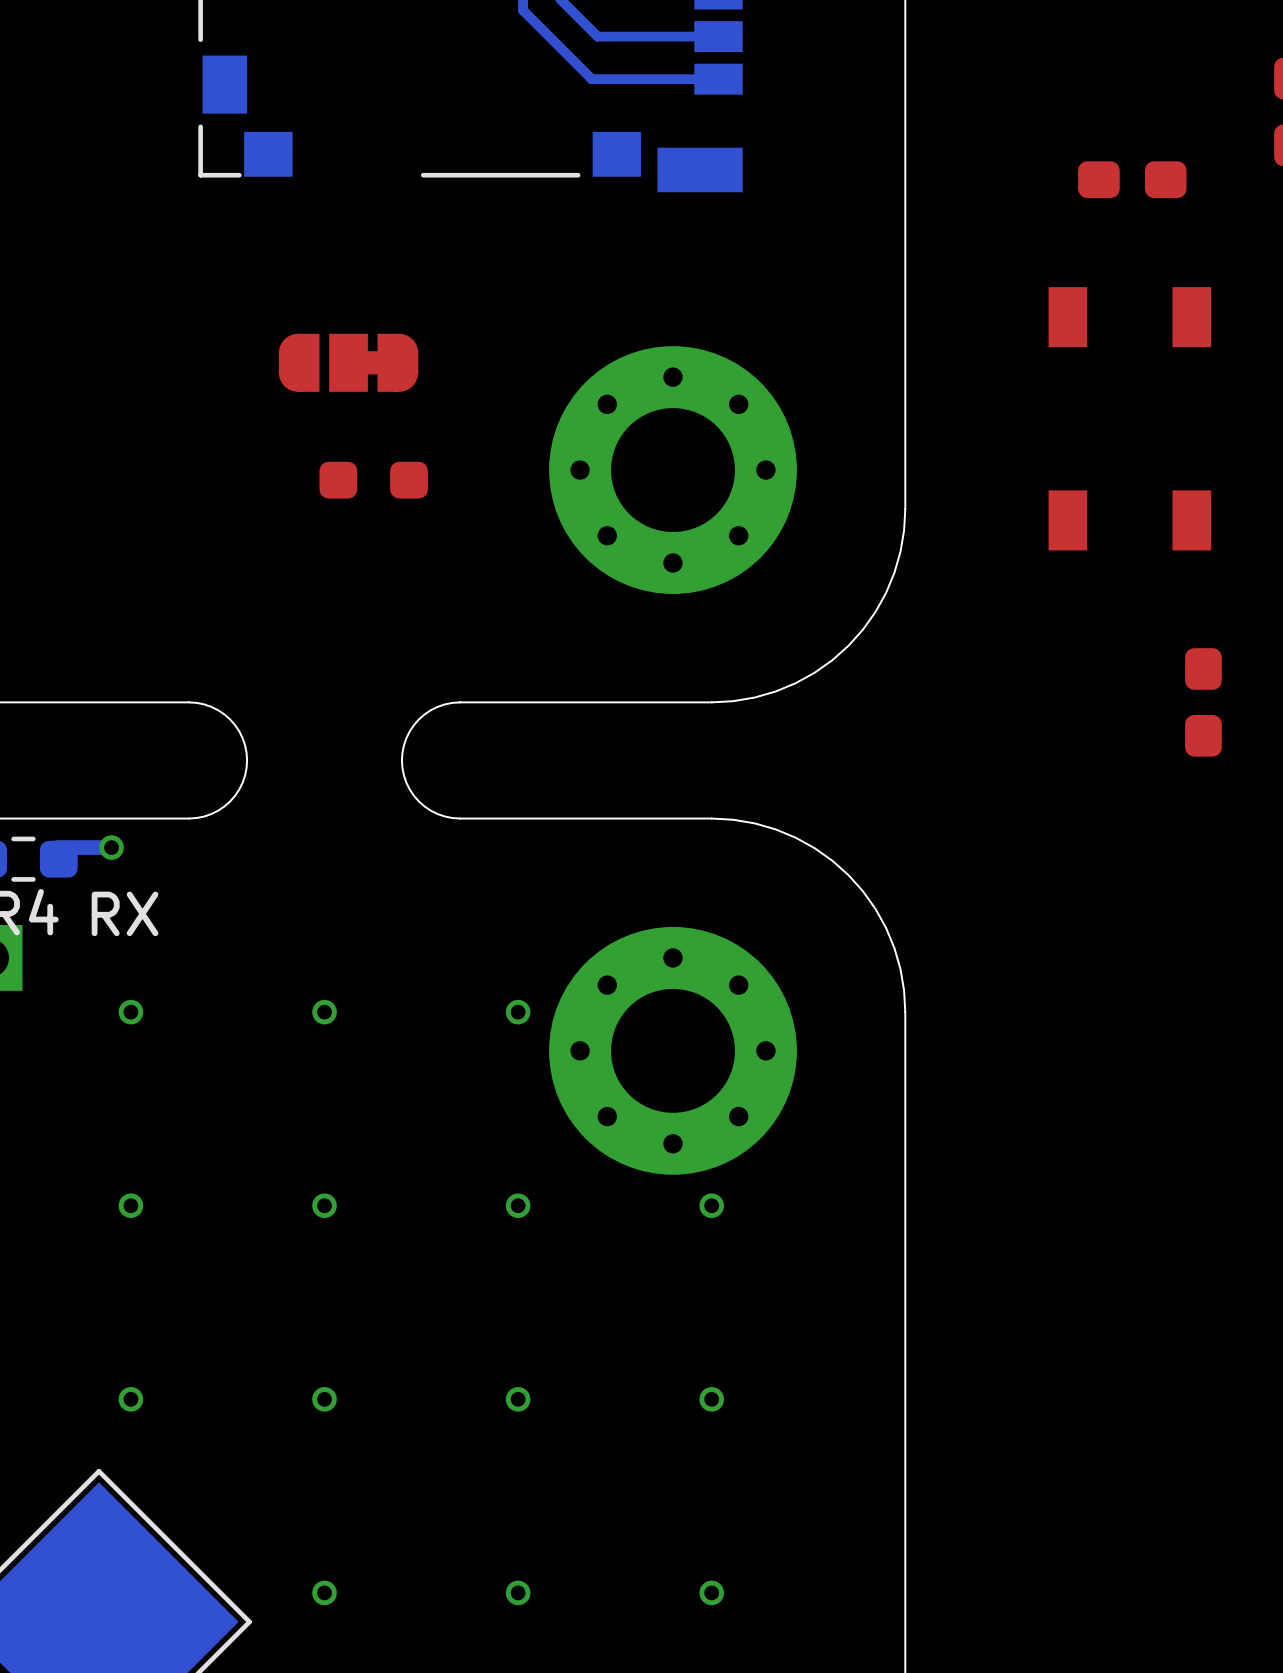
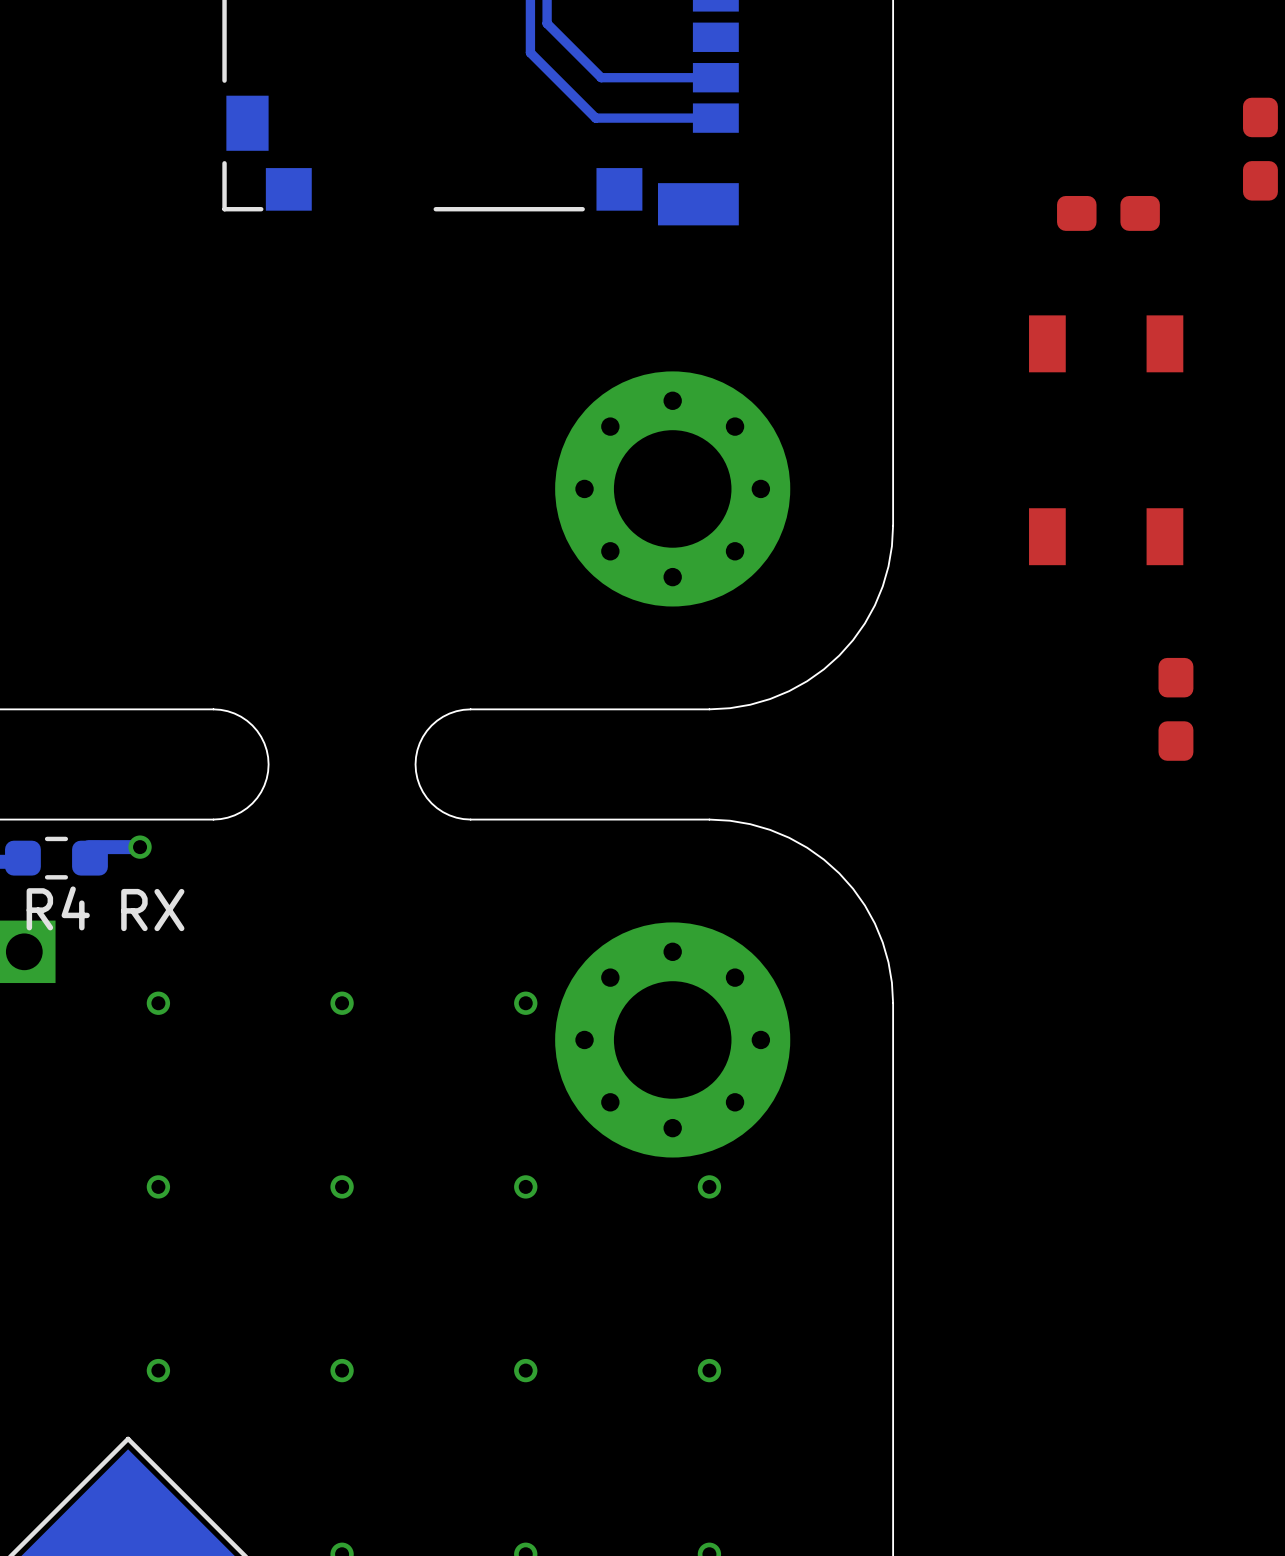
part: (348, 362) -> none
part: (373, 480) -> none

